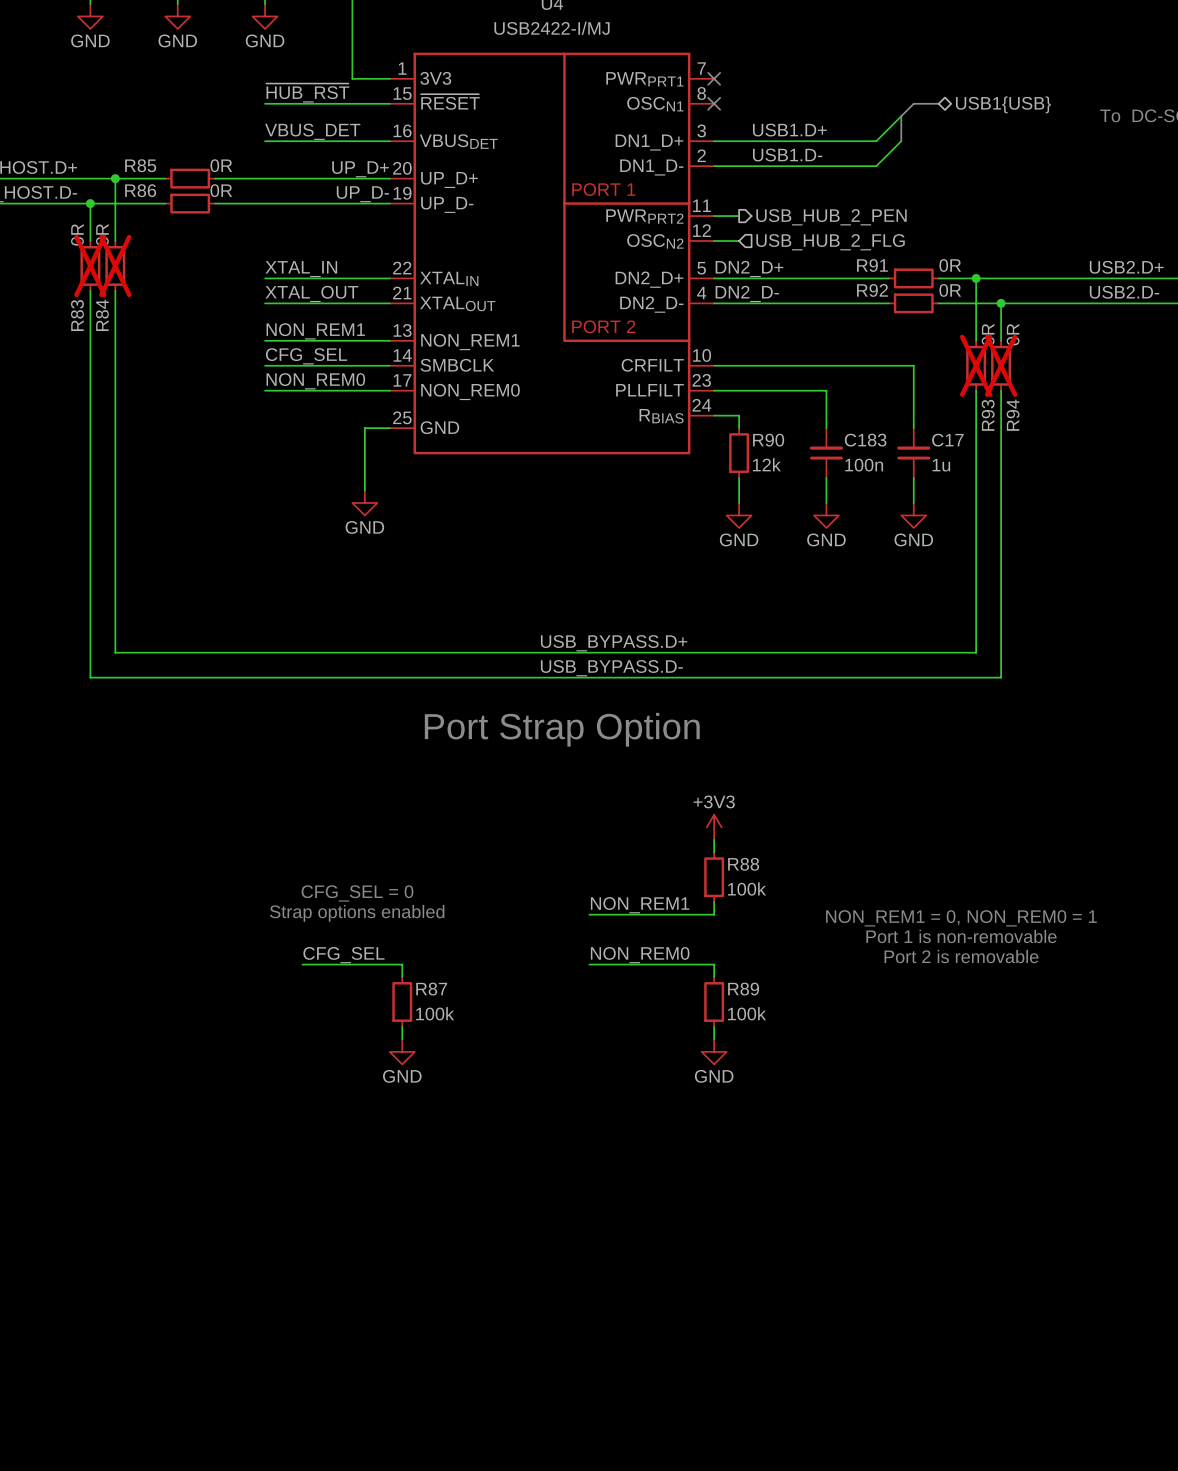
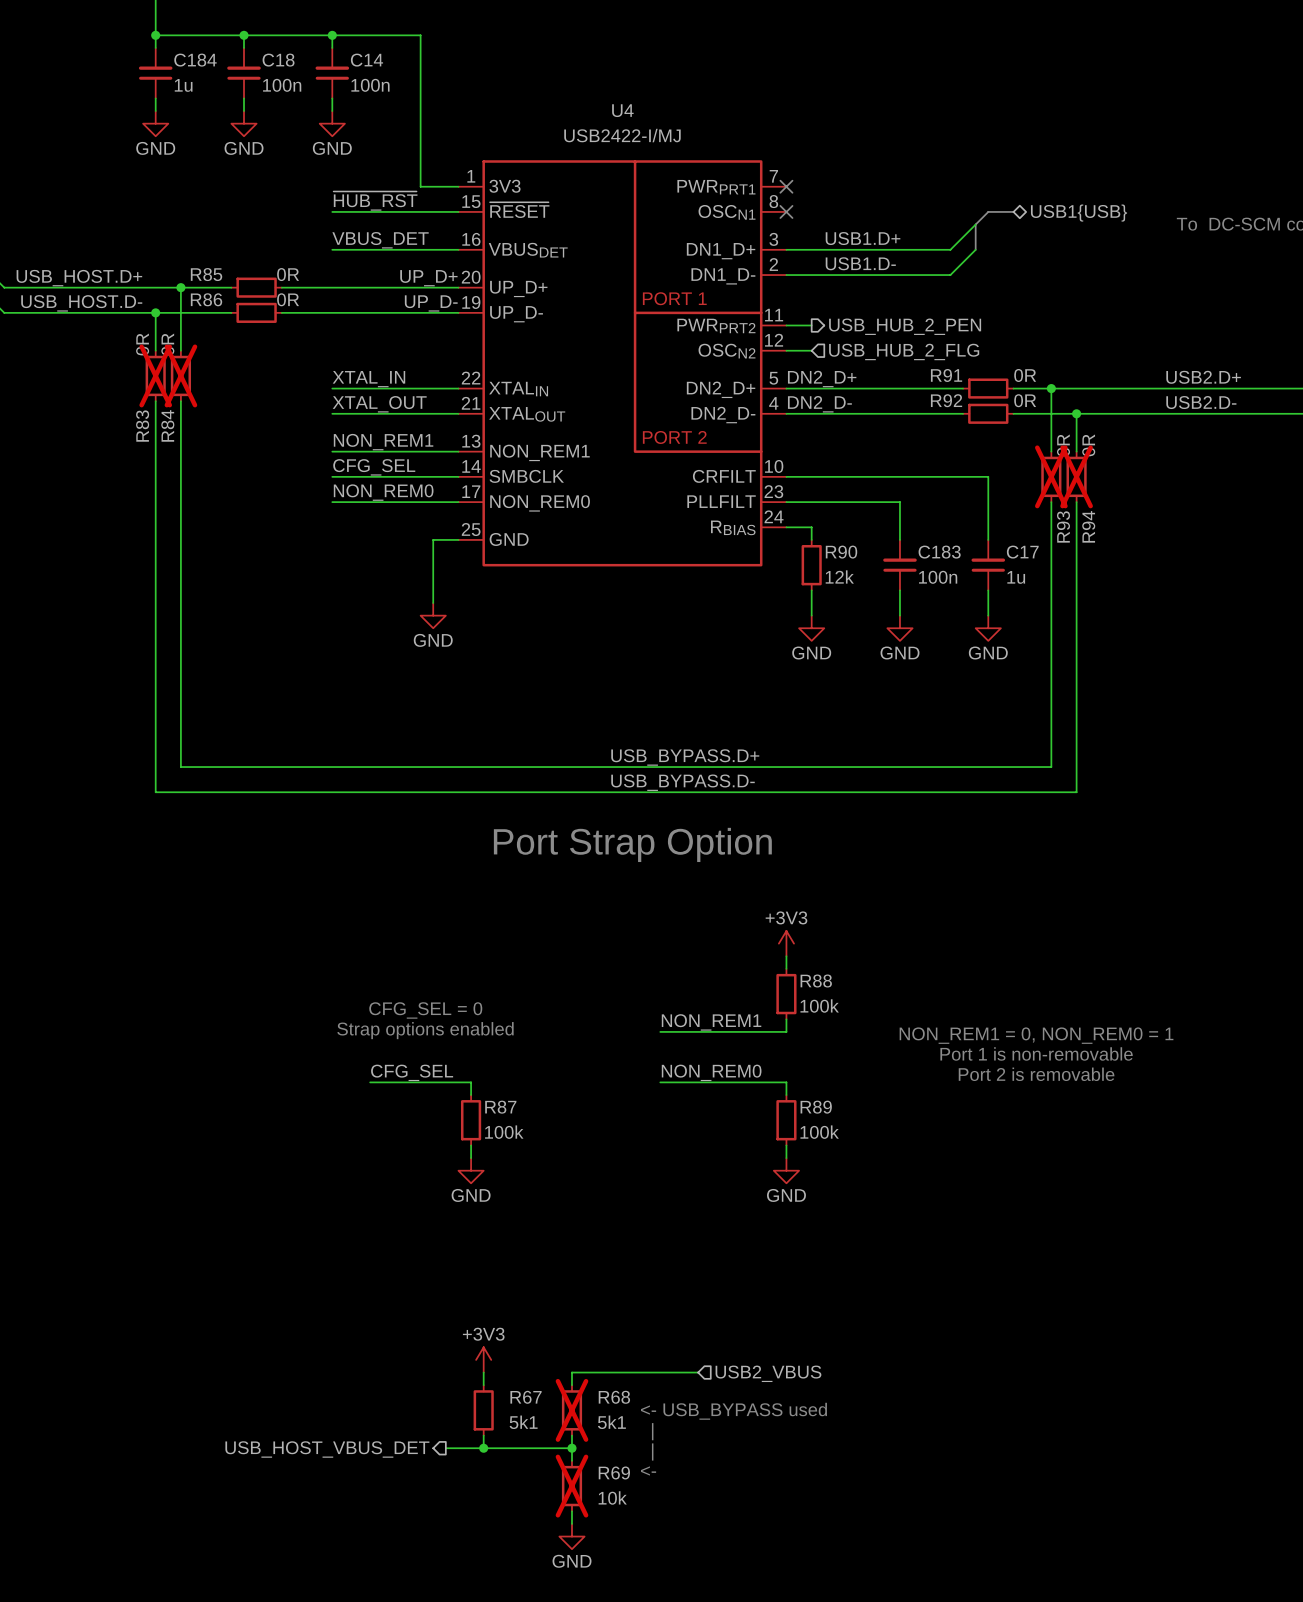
power symbol: none -> +3V3 (483, 1359)
wire: none -> (483, 1372) (483, 1385)
wire: none -> (698, 1372) (571, 1372) (571, 1385)
hierarchical label: none -> USB2_VBUS (768, 1373)
R67: none -> (483, 1410)
R68: none -> (571, 1410)
text: none -> <- USB_BYPASS used (734, 1411)
text: none -> | (652, 1431)
wire: none -> (483, 1435) (483, 1448)
wire: none -> (571, 1435) (571, 1460)
wire: none -> (445, 1448) (571, 1448)
junction: none -> (483, 1448)
junction: none -> (571, 1448)
hierarchical label: none -> USB_HOST_VBUS_DET (327, 1449)
text: none -> | (652, 1451)
text: none -> <- (648, 1470)
R69: none -> (571, 1486)
wire: none -> (571, 1511) (571, 1523)
power symbol: none -> GND (571, 1536)

